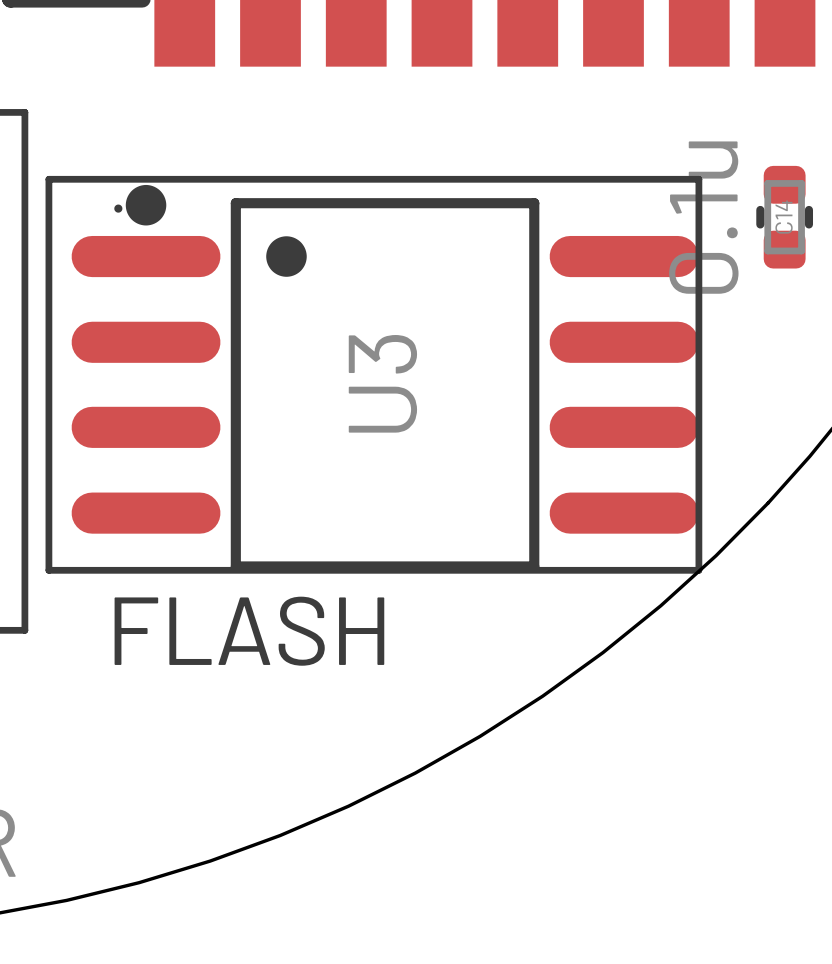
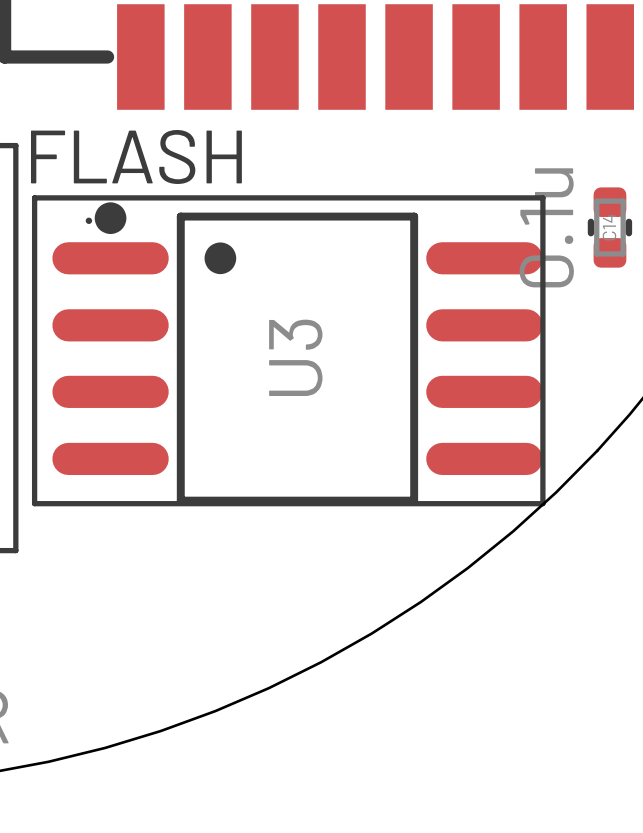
text position: FLASH (249, 631) -> FLASH (136, 156)

